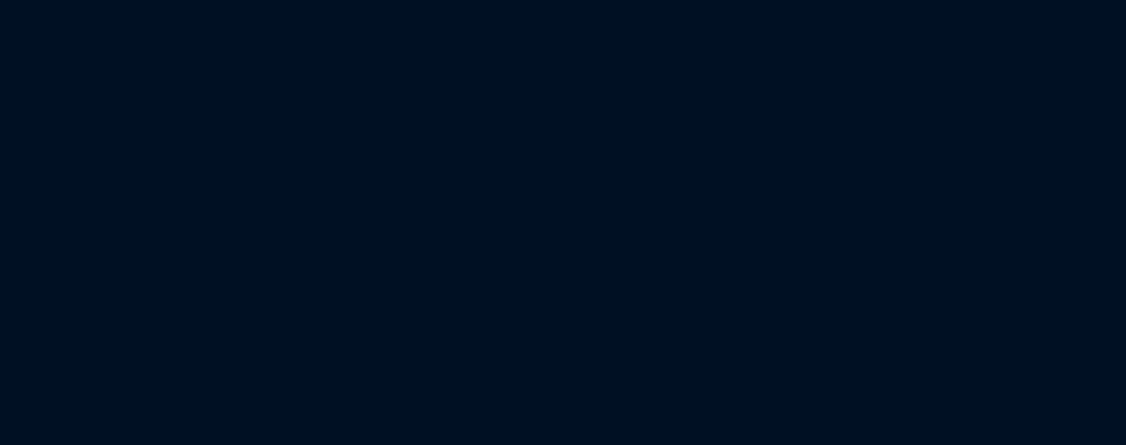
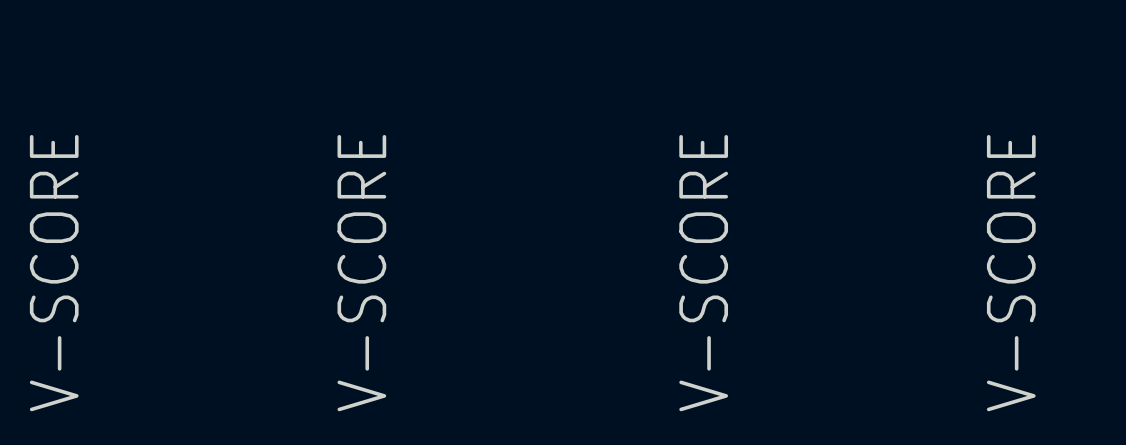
text: none -> V-SCORE (54, 273)
text: none -> V-SCORE (361, 273)
text: none -> V-SCORE (703, 273)
text: none -> V-SCORE (1011, 273)

